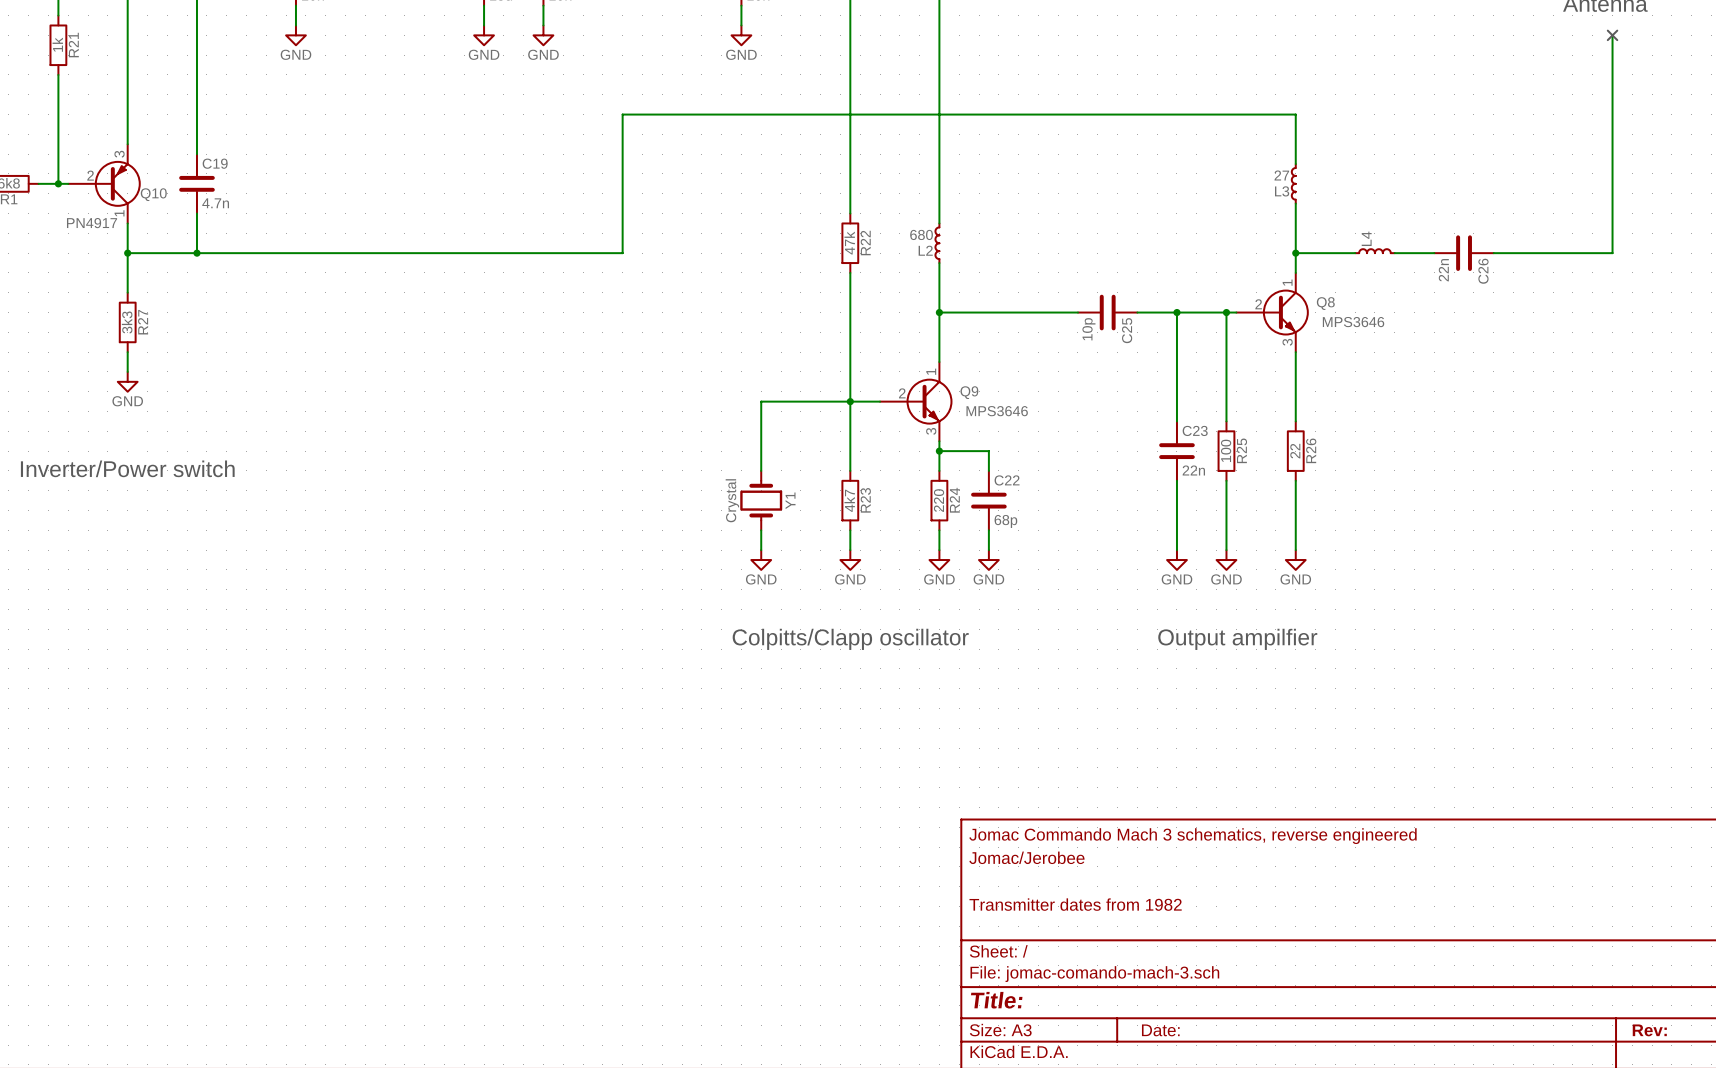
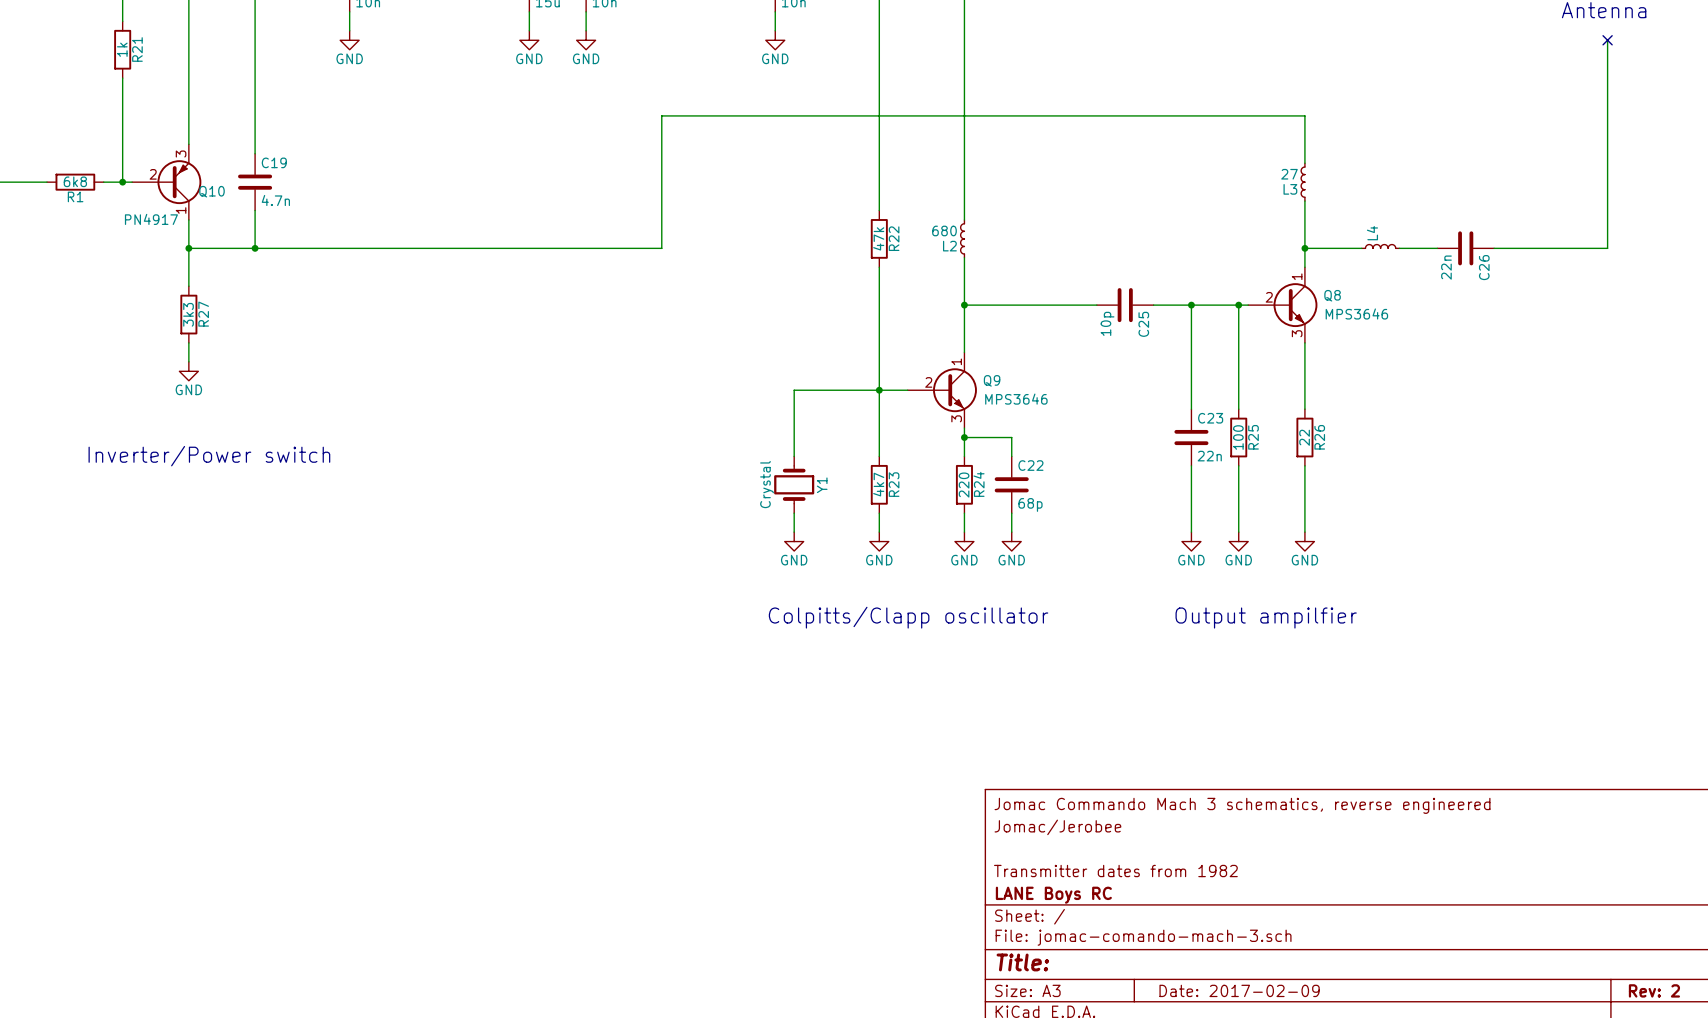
title block: none -> LANE Boys RC (1053, 895)
title block: Date: (1160, 1030) -> Date: 2017-02-09 (1239, 990)
title block: Rev: (1649, 1030) -> Rev: 2 (1654, 990)

